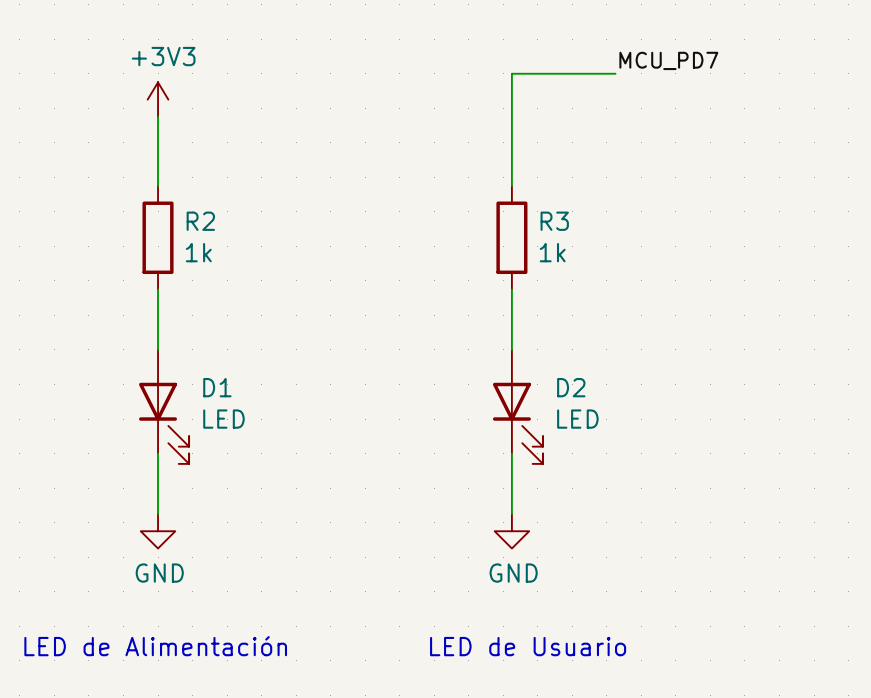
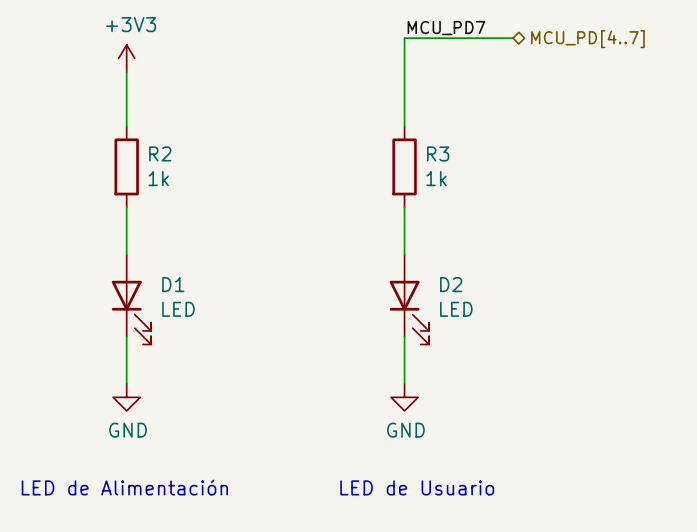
label position: MCU_PD7 (668, 60) -> MCU_PD7 (446, 28)
wire: none -> (485, 38) (512, 38)
hierarchical label: none -> MCU_PD[4..7] (587, 39)

